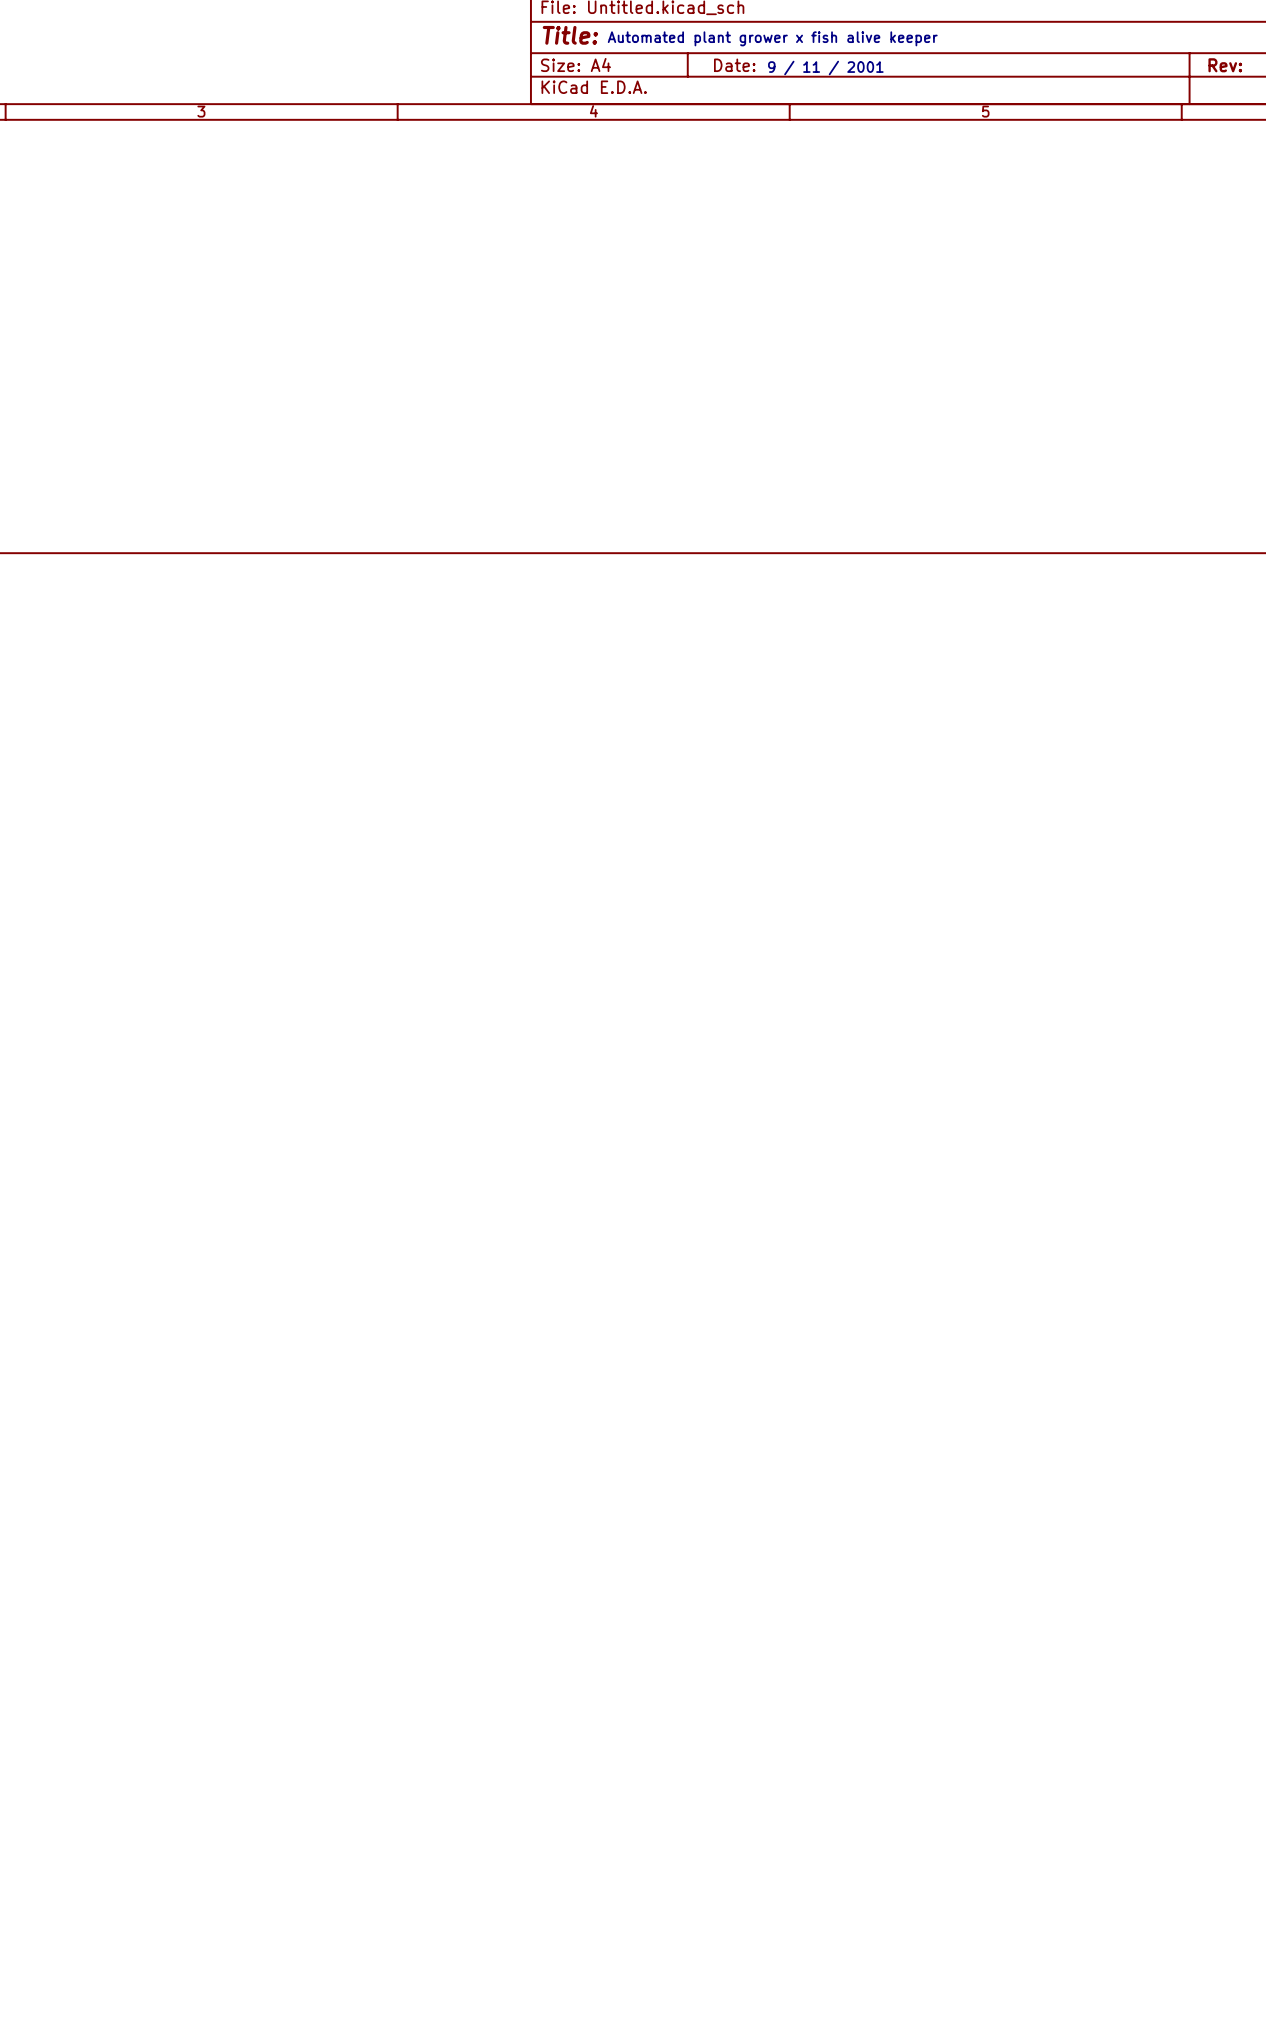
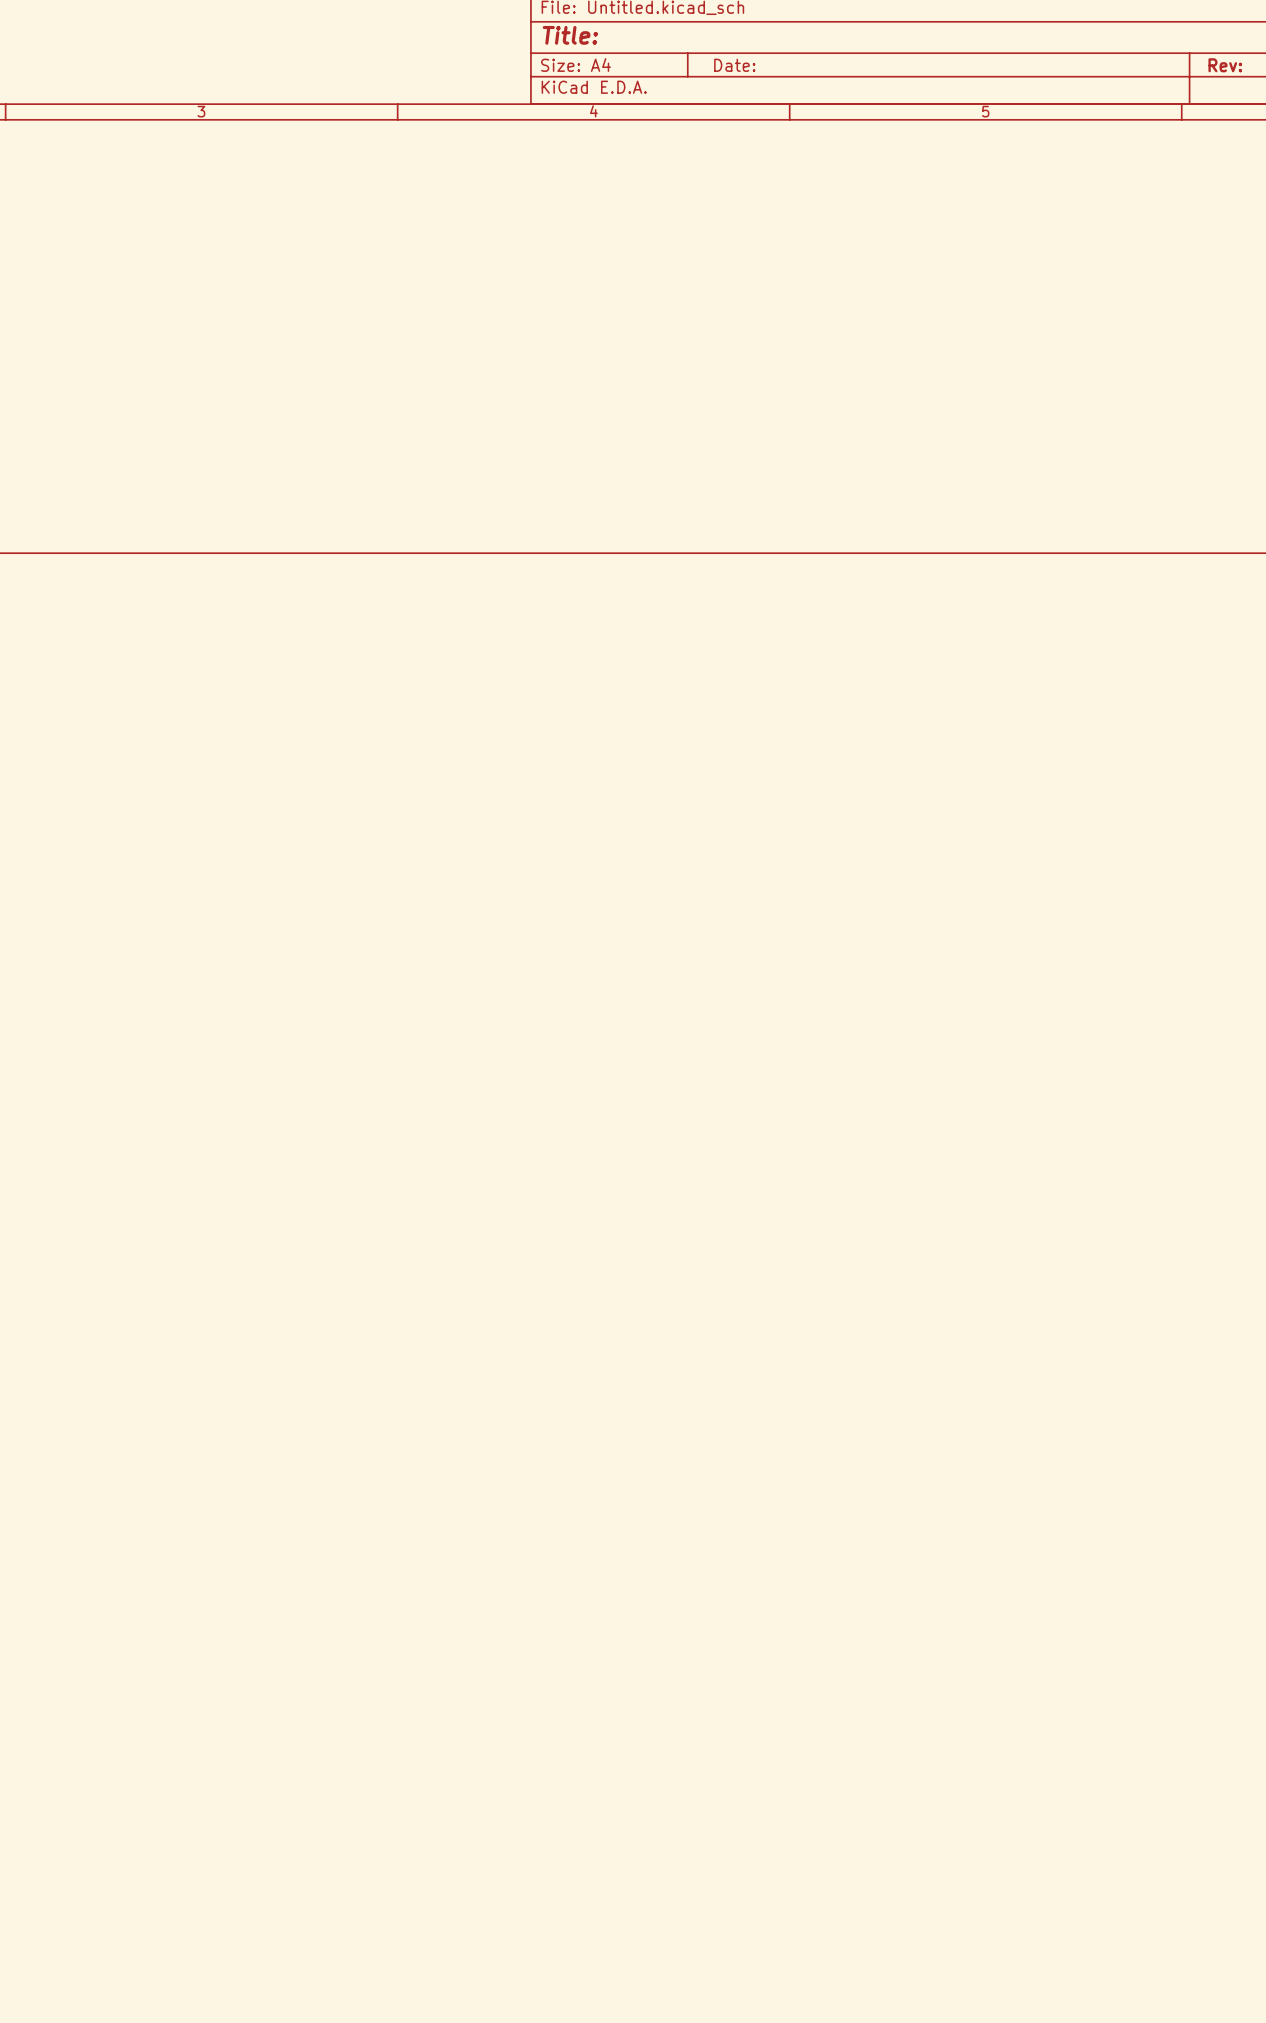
text: Automated plant grower x fish alive keeper (772, 38) -> none
text: 9 / 11 / 2001 (825, 68) -> none

